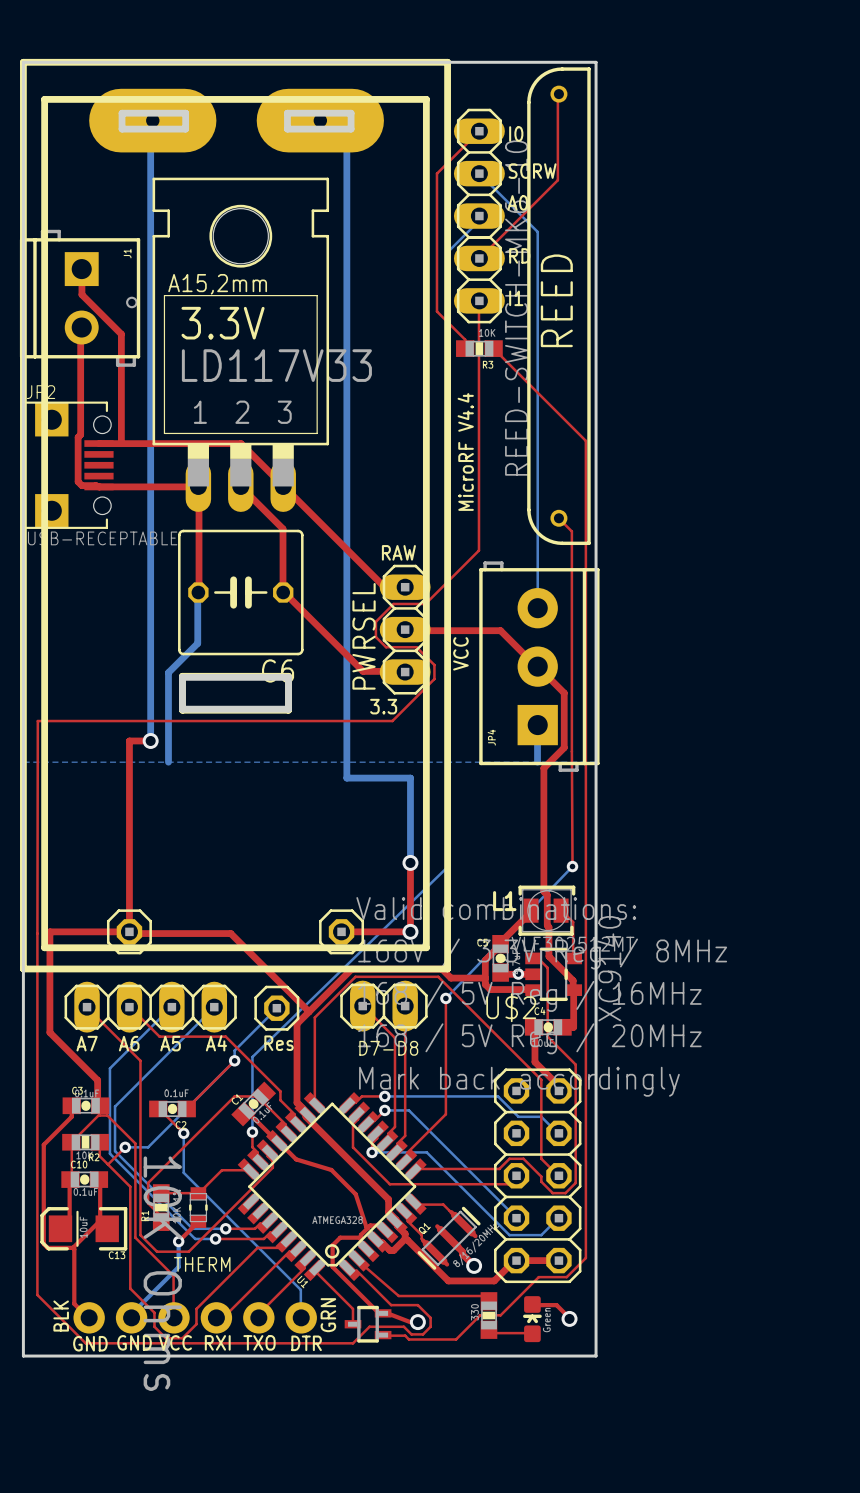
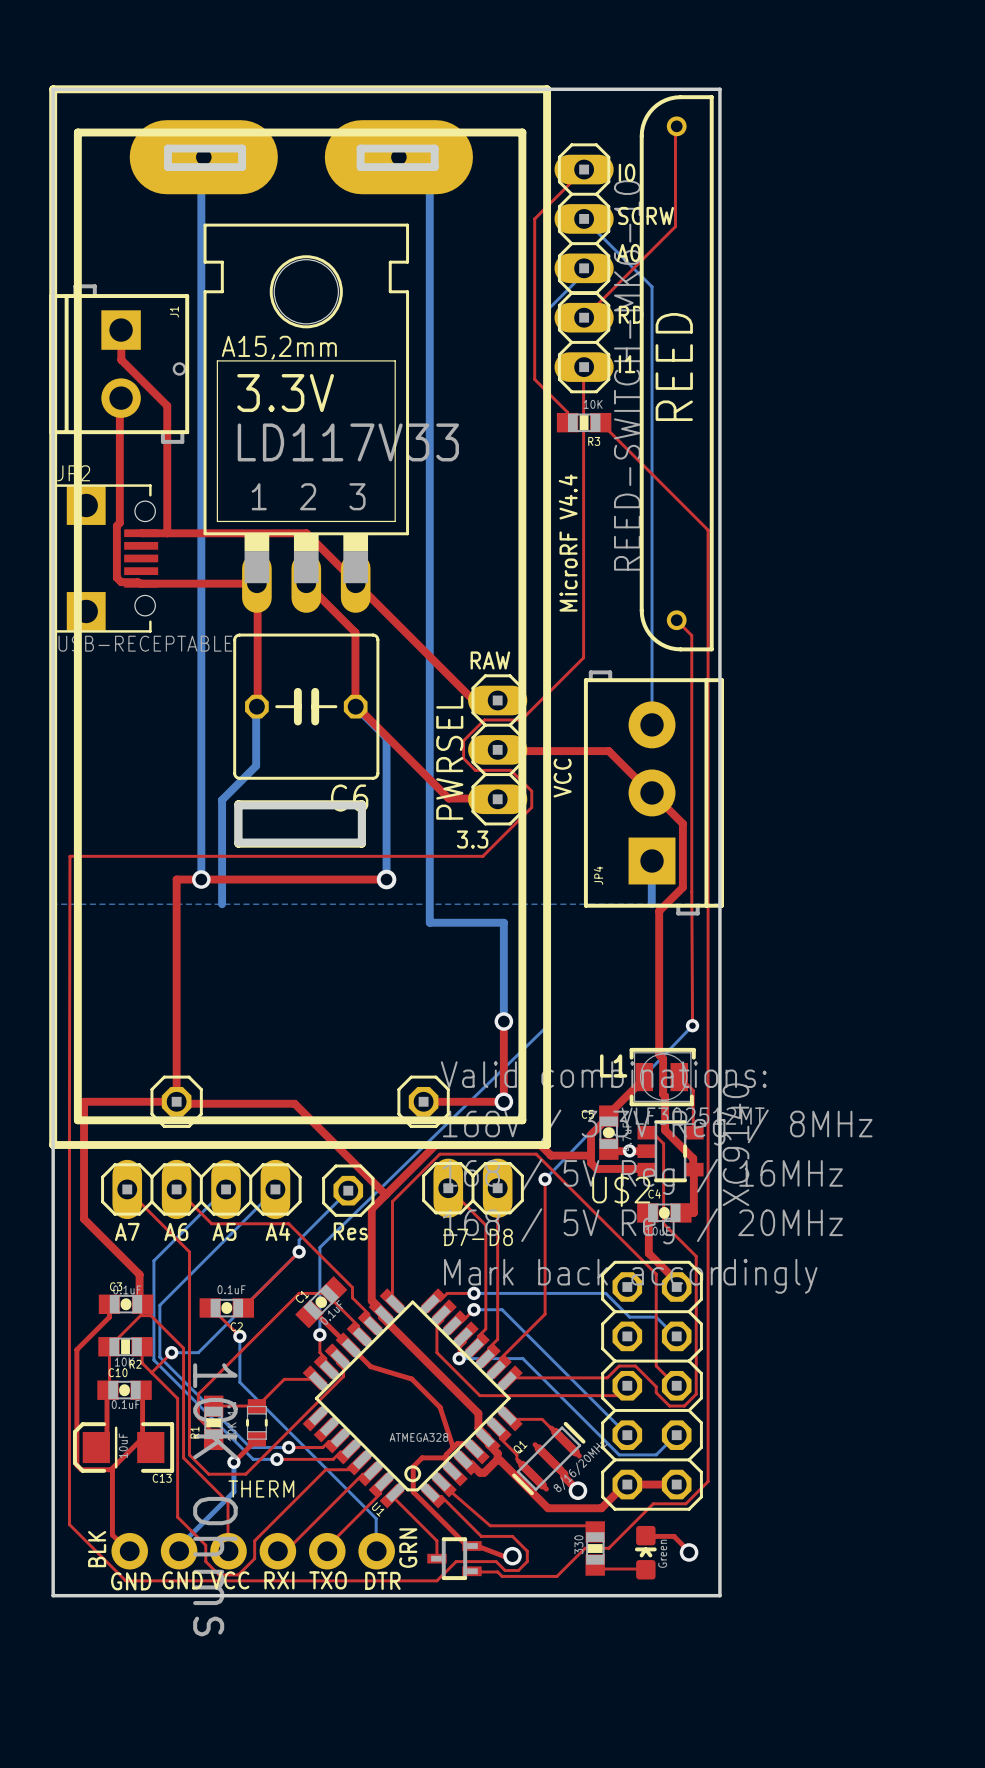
bottom track: none -> (355, 706) (386, 737) (386, 879)
top track: none -> (201, 879) (386, 879)
via: none -> (386, 879)

